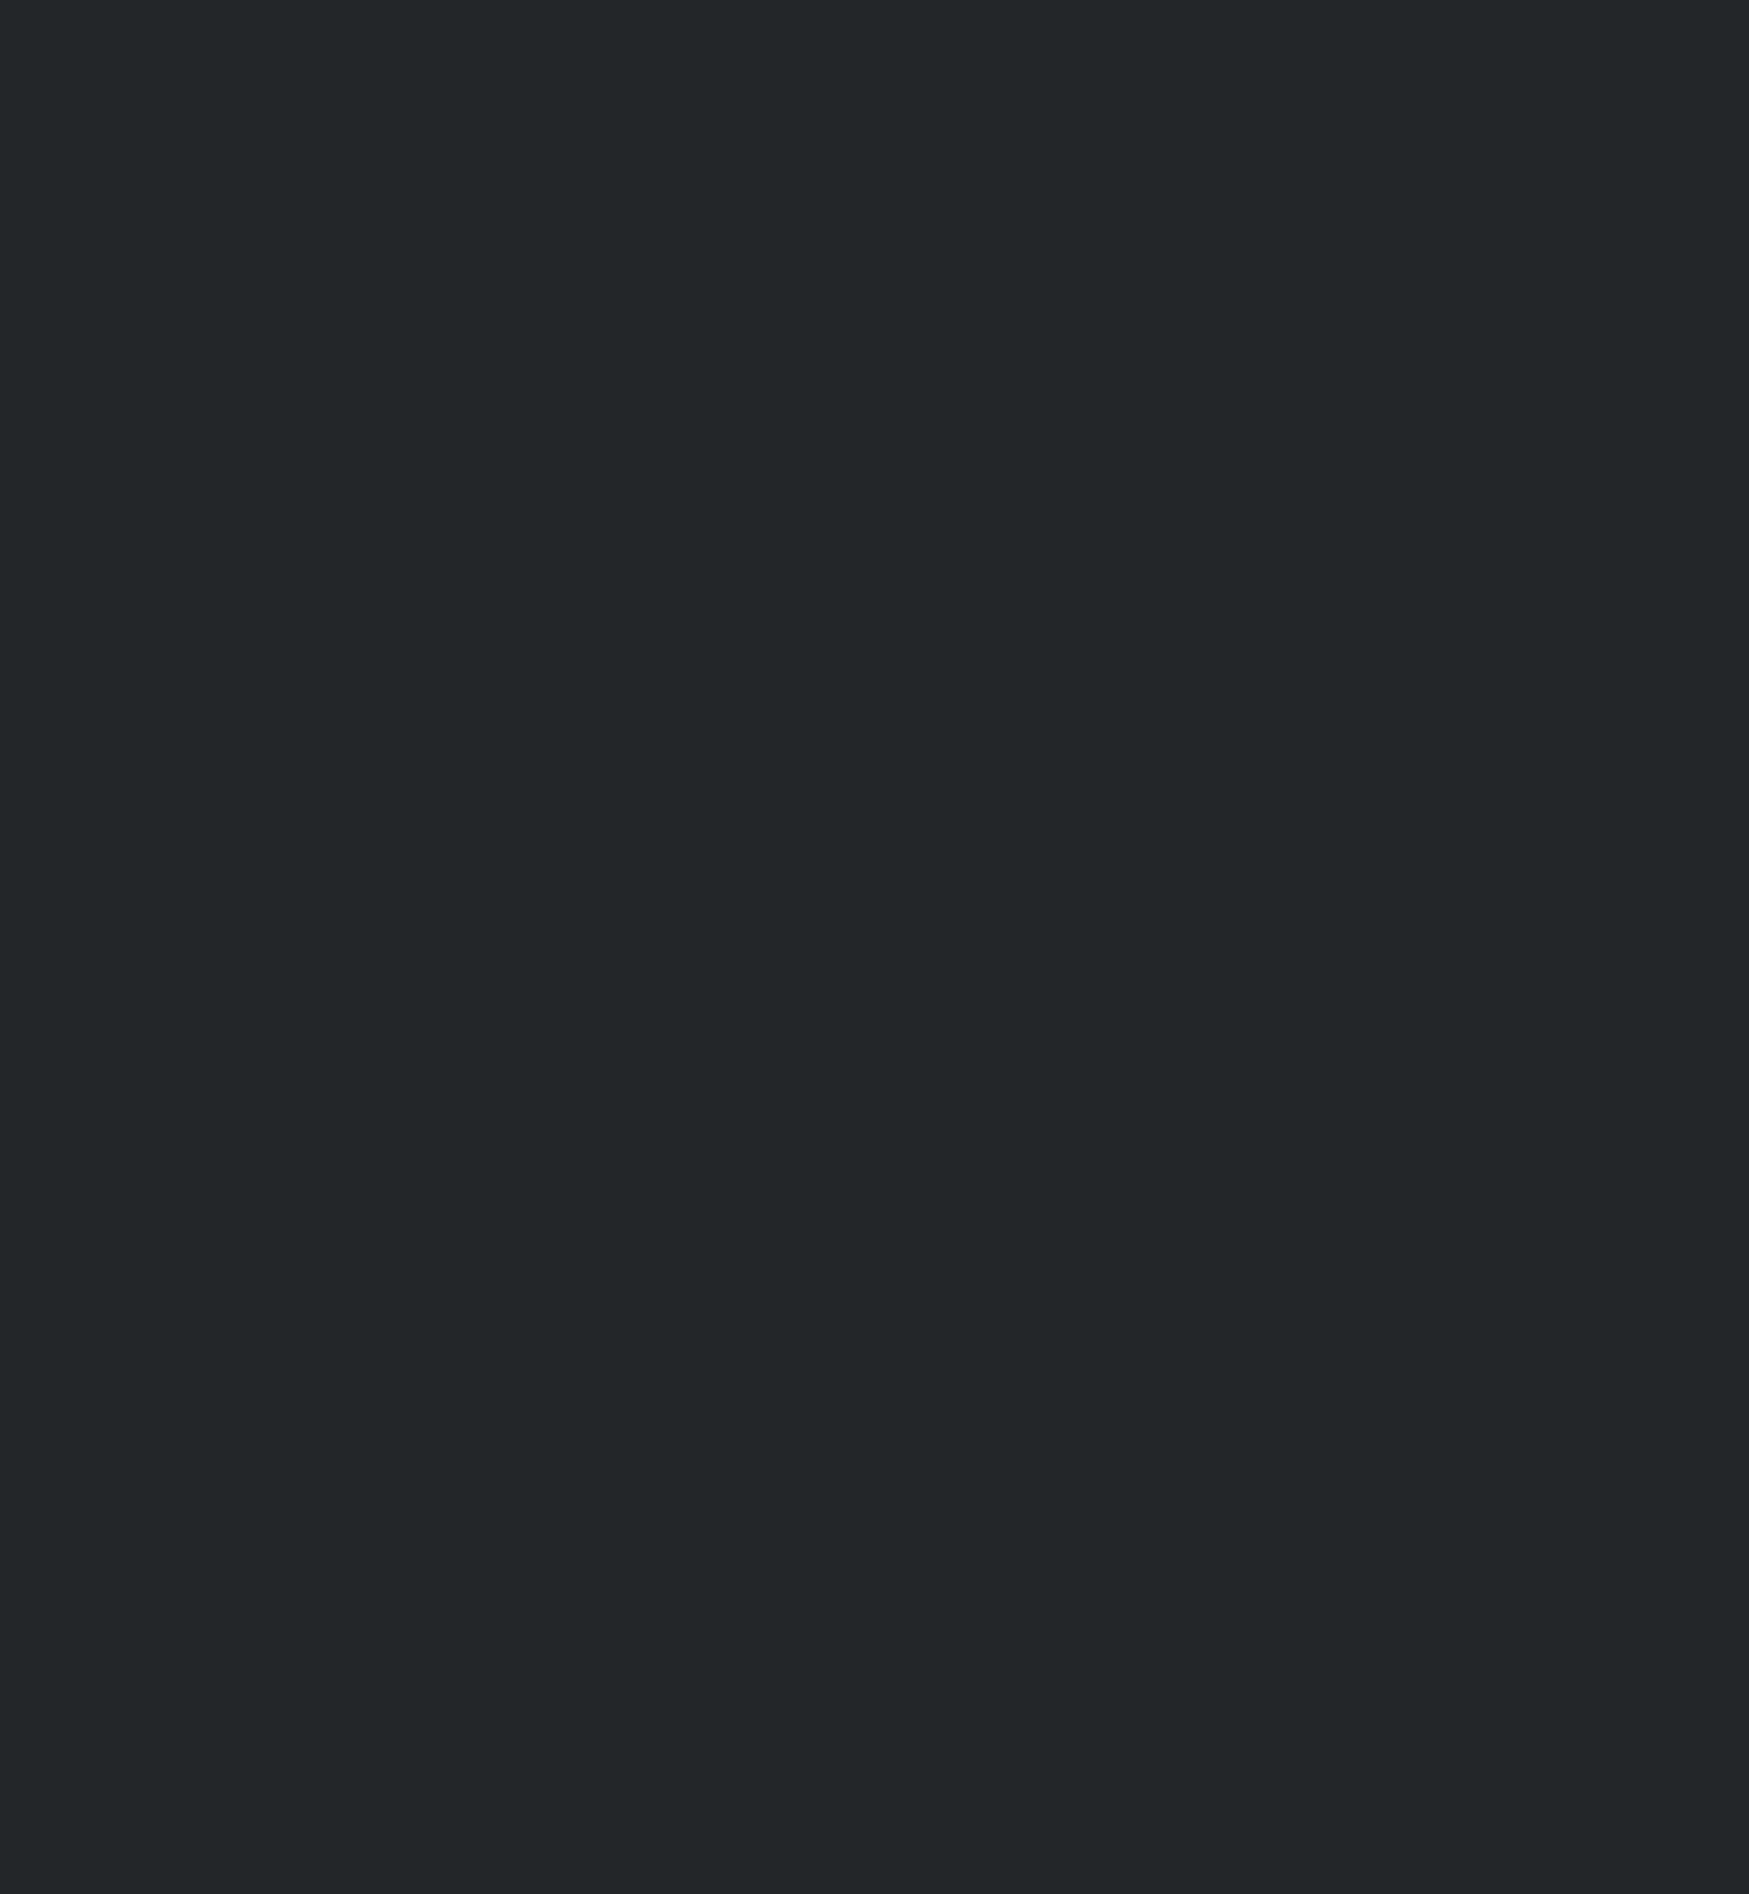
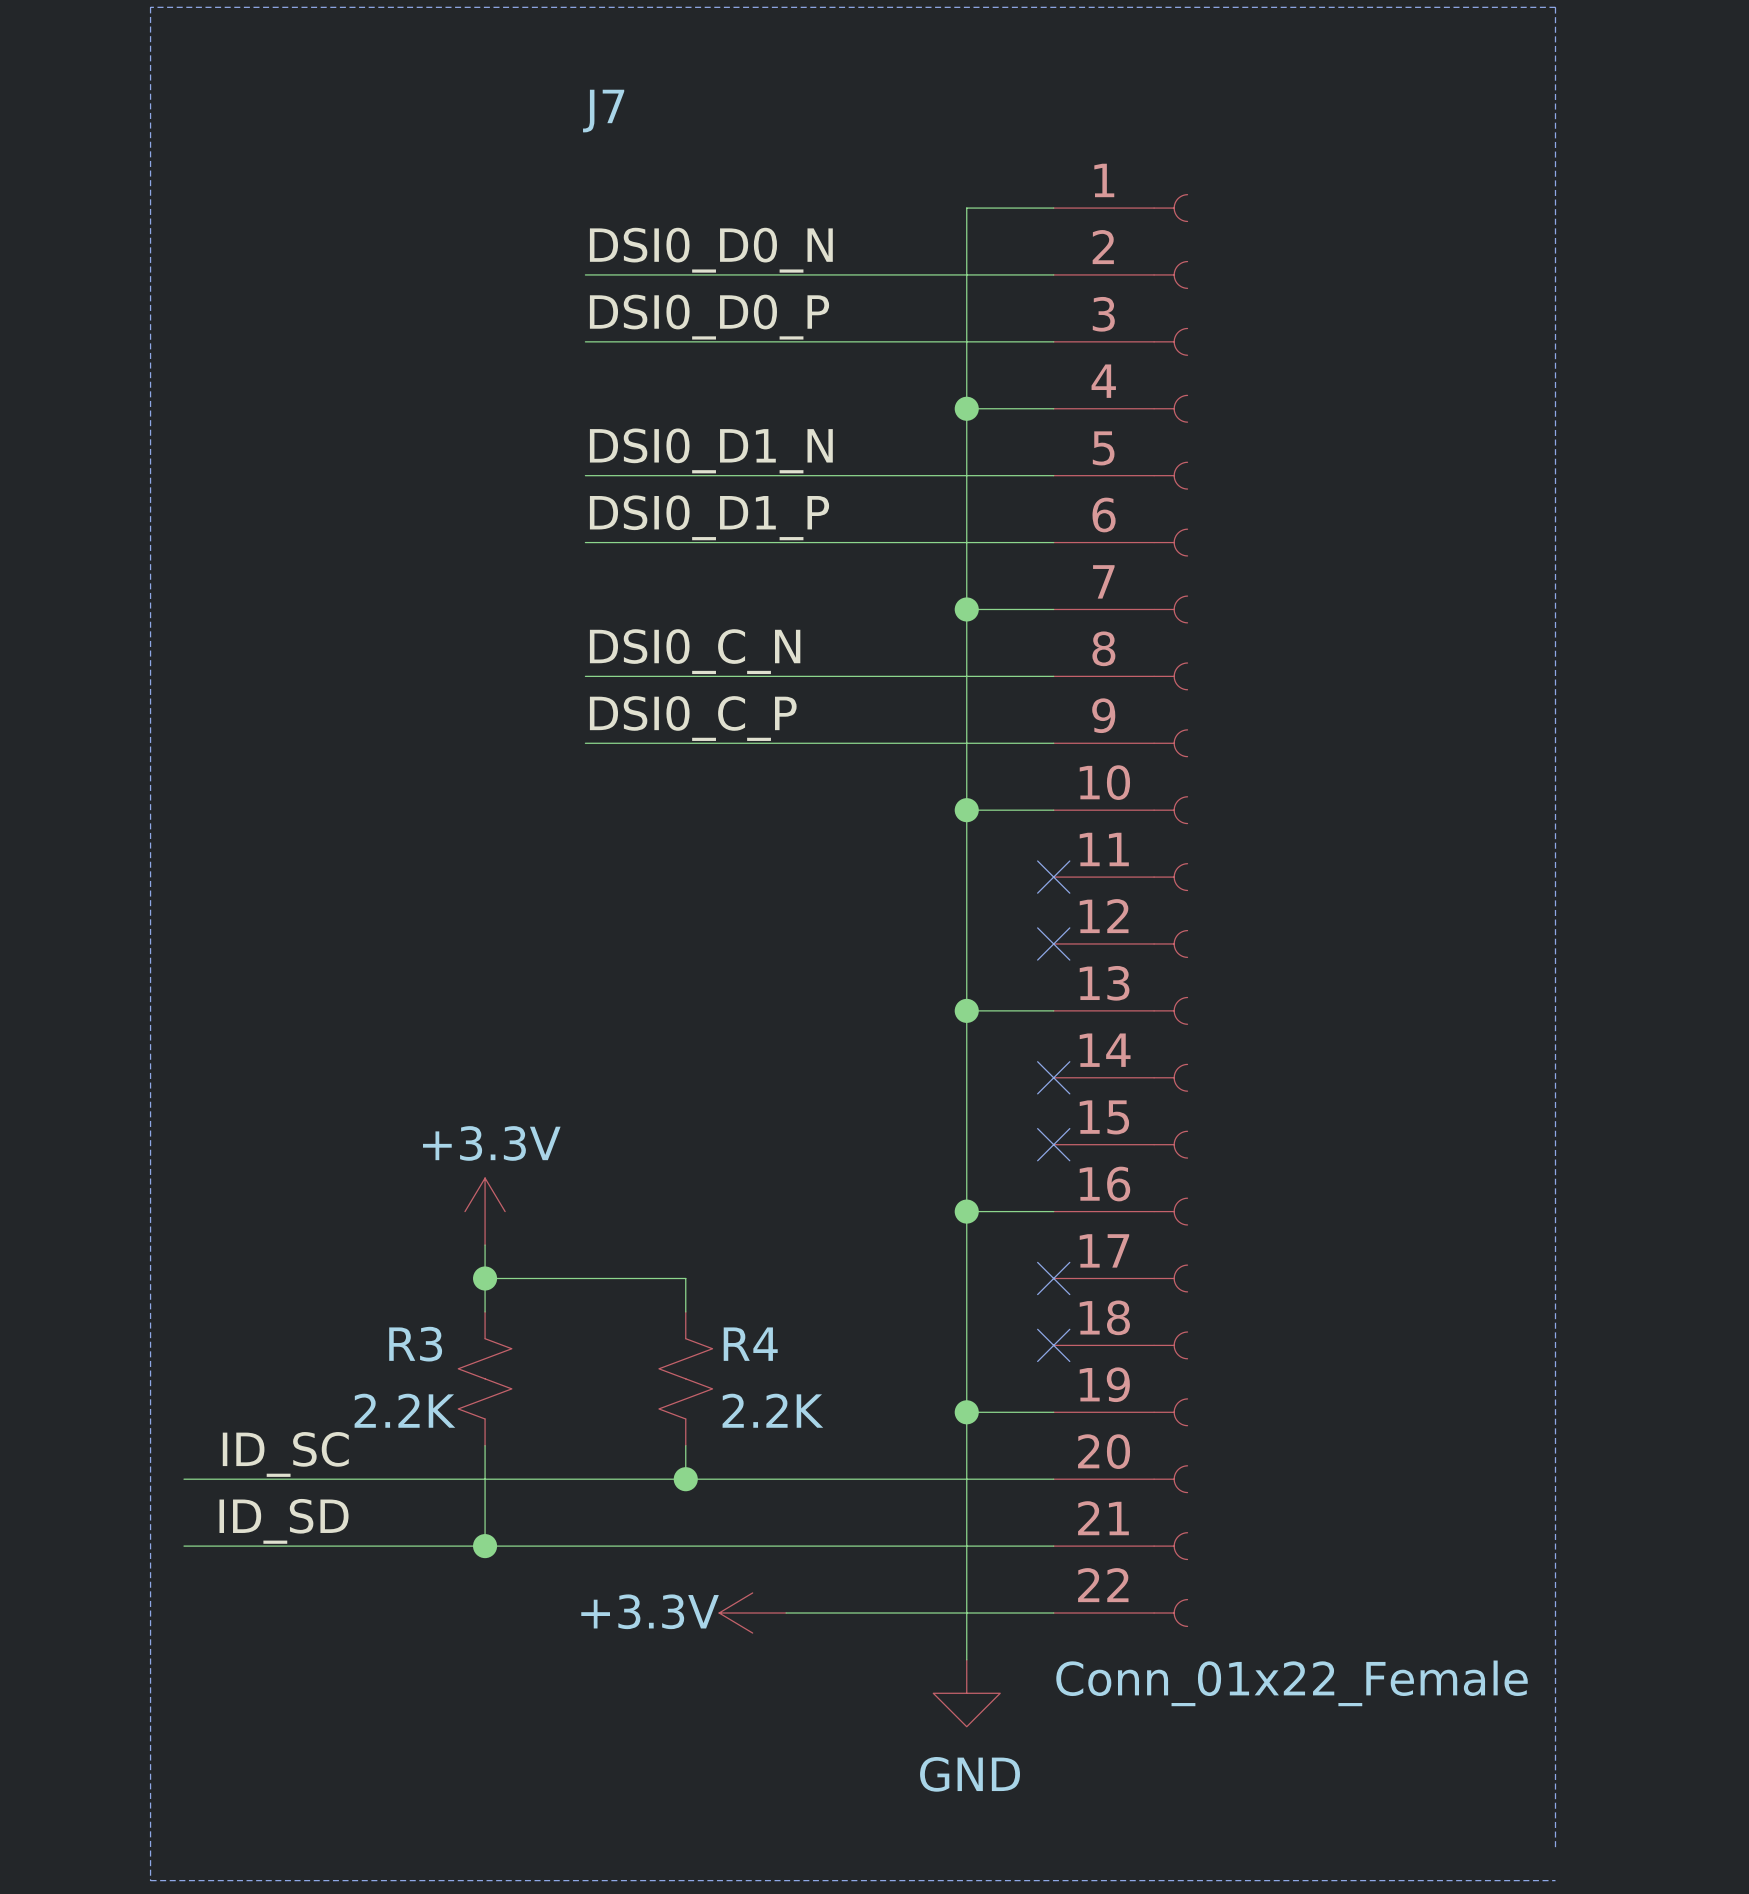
wire: none -> (1053, 208) (966, 208) (966, 1659)
label: none -> DSI0_D0_N (711, 250)
wire: none -> (585, 274) (1053, 274)
label: none -> DSI0_D0_P (709, 317)
wire: none -> (585, 341) (1053, 341)
wire: none -> (966, 408) (1053, 408)
junction: none -> (966, 408)
label: none -> DSI0_D1_N (711, 450)
wire: none -> (585, 475) (1053, 475)
label: none -> DSI0_D1_P (709, 517)
wire: none -> (585, 542) (1053, 542)
wire: none -> (966, 609) (1053, 609)
junction: none -> (966, 609)
label: none -> DSI0_C_N (695, 651)
wire: none -> (585, 676) (1053, 676)
label: none -> DSI0_C_P (693, 718)
wire: none -> (585, 743) (1053, 743)
wire: none -> (966, 810) (1053, 810)
junction: none -> (966, 810)
no-connect mark: none -> (1053, 877)
J7: none -> Conn_01x22_Female (1120, 910)
no-connect mark: none -> (1053, 943)
wire: none -> (966, 1010) (1053, 1010)
junction: none -> (966, 1010)
no-connect mark: none -> (1053, 1077)
no-connect mark: none -> (1053, 1144)
power symbol: none -> +3.3V (485, 1211)
wire: none -> (966, 1211) (1053, 1211)
junction: none -> (966, 1211)
wire: none -> (485, 1245) (485, 1311)
wire: none -> (485, 1278) (685, 1278) (685, 1311)
junction: none -> (485, 1278)
no-connect mark: none -> (1053, 1278)
no-connect mark: none -> (1053, 1345)
R3: none -> 2.2K (485, 1378)
R4: none -> 2.2K (685, 1378)
wire: none -> (966, 1412) (1053, 1412)
junction: none -> (966, 1412)
wire: none -> (485, 1445) (485, 1546)
wire: none -> (685, 1445) (685, 1479)
label: none -> ID_SC (285, 1454)
wire: none -> (183, 1479) (1053, 1479)
junction: none -> (685, 1479)
label: none -> ID_SD (284, 1521)
wire: none -> (183, 1546) (1053, 1546)
junction: none -> (485, 1546)
power symbol: none -> +3.3V (752, 1613)
wire: none -> (786, 1613) (1053, 1613)
power symbol: none -> GND (966, 1693)
line: none -> (1555, 1847) (1555, 7) (150, 7) (150, 1880) (1555, 1880)

